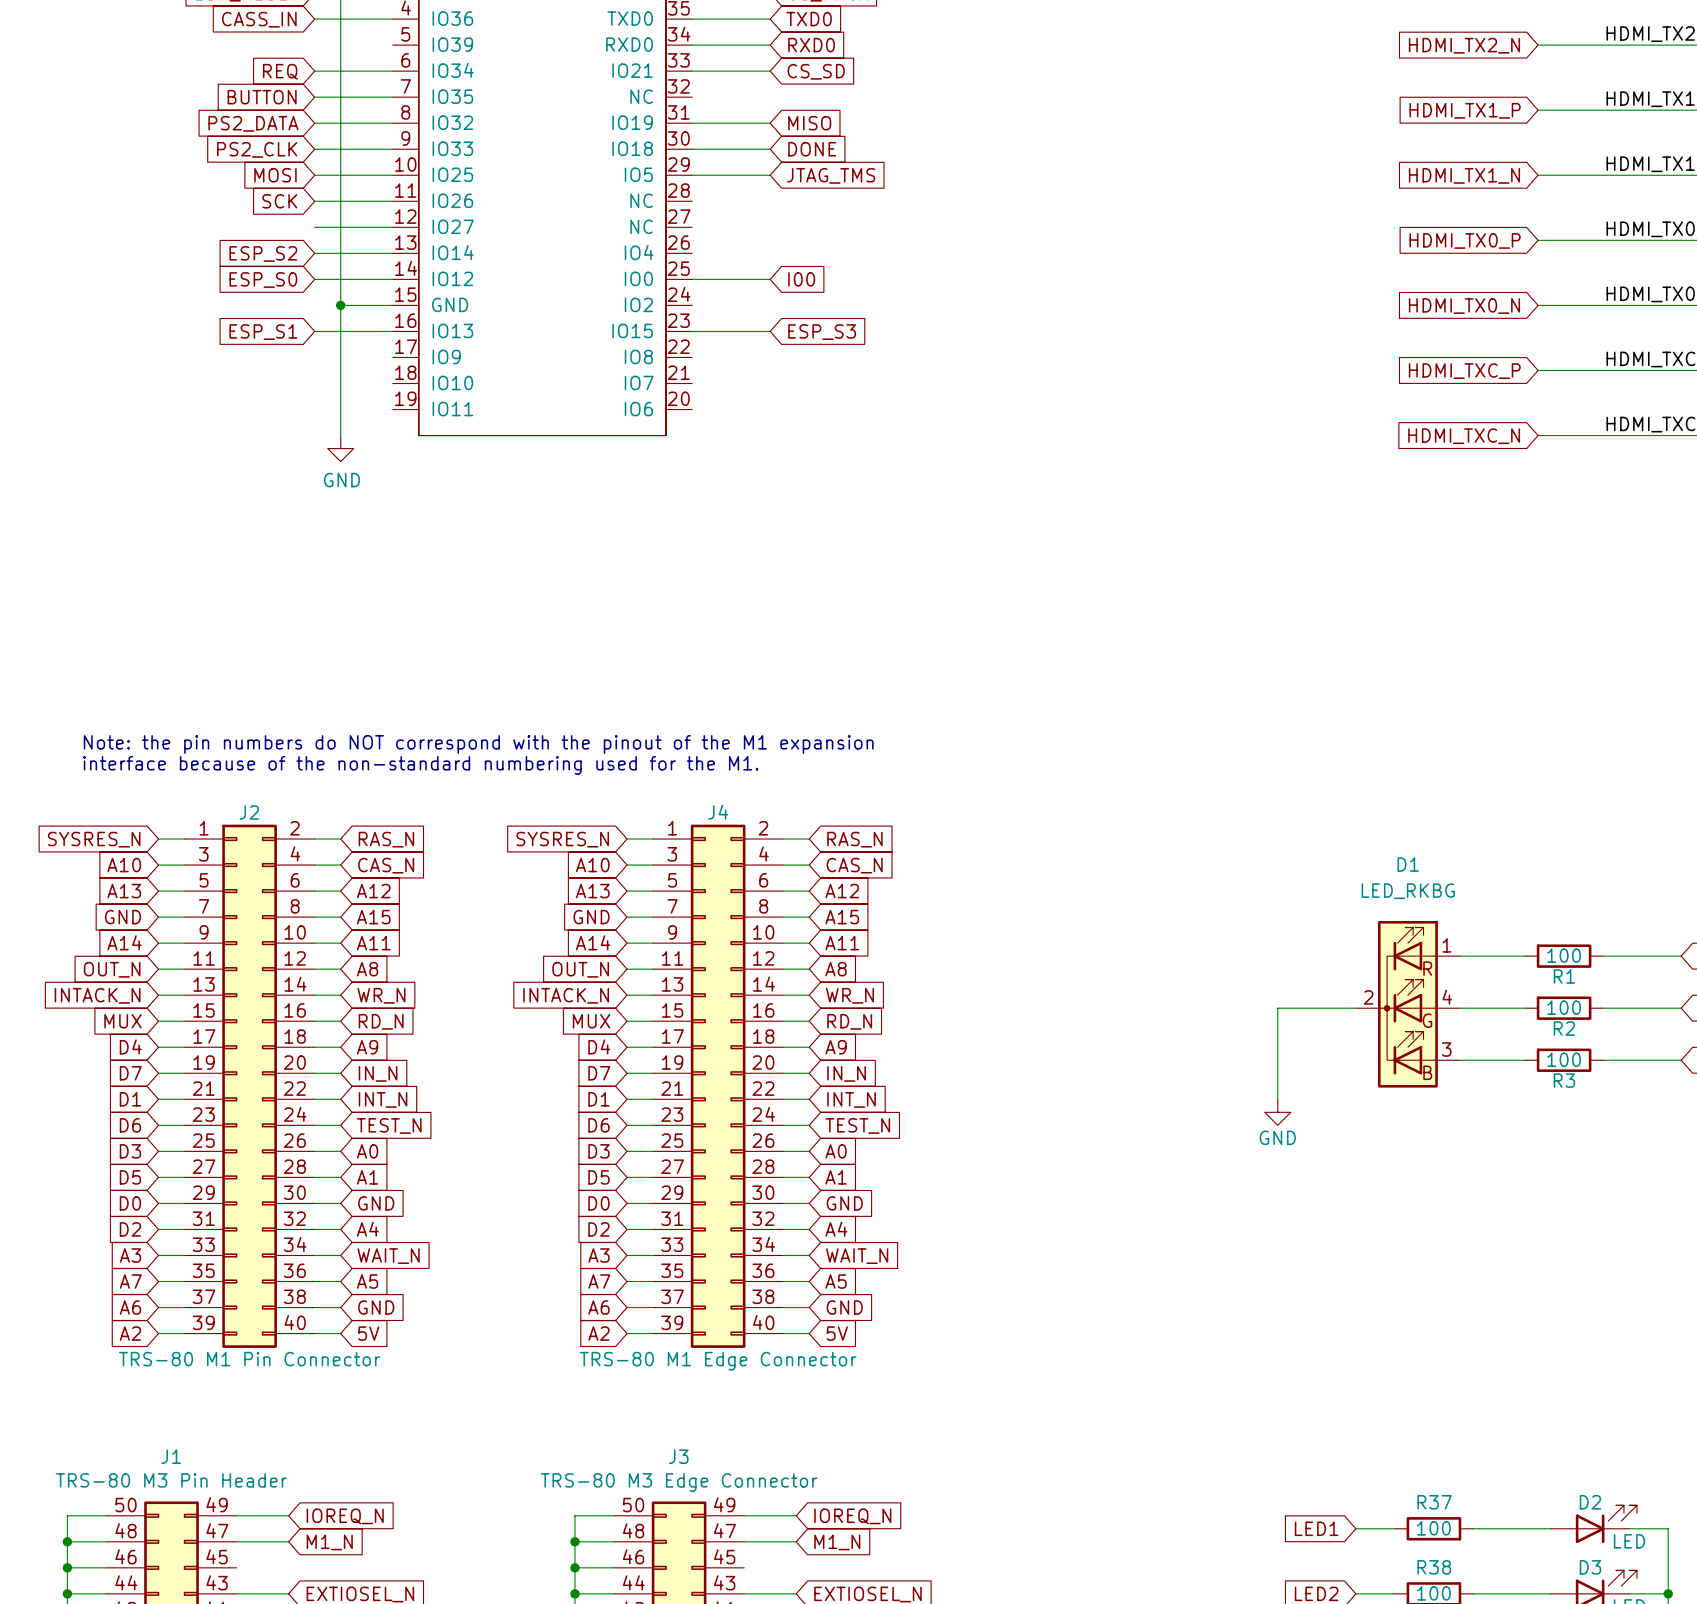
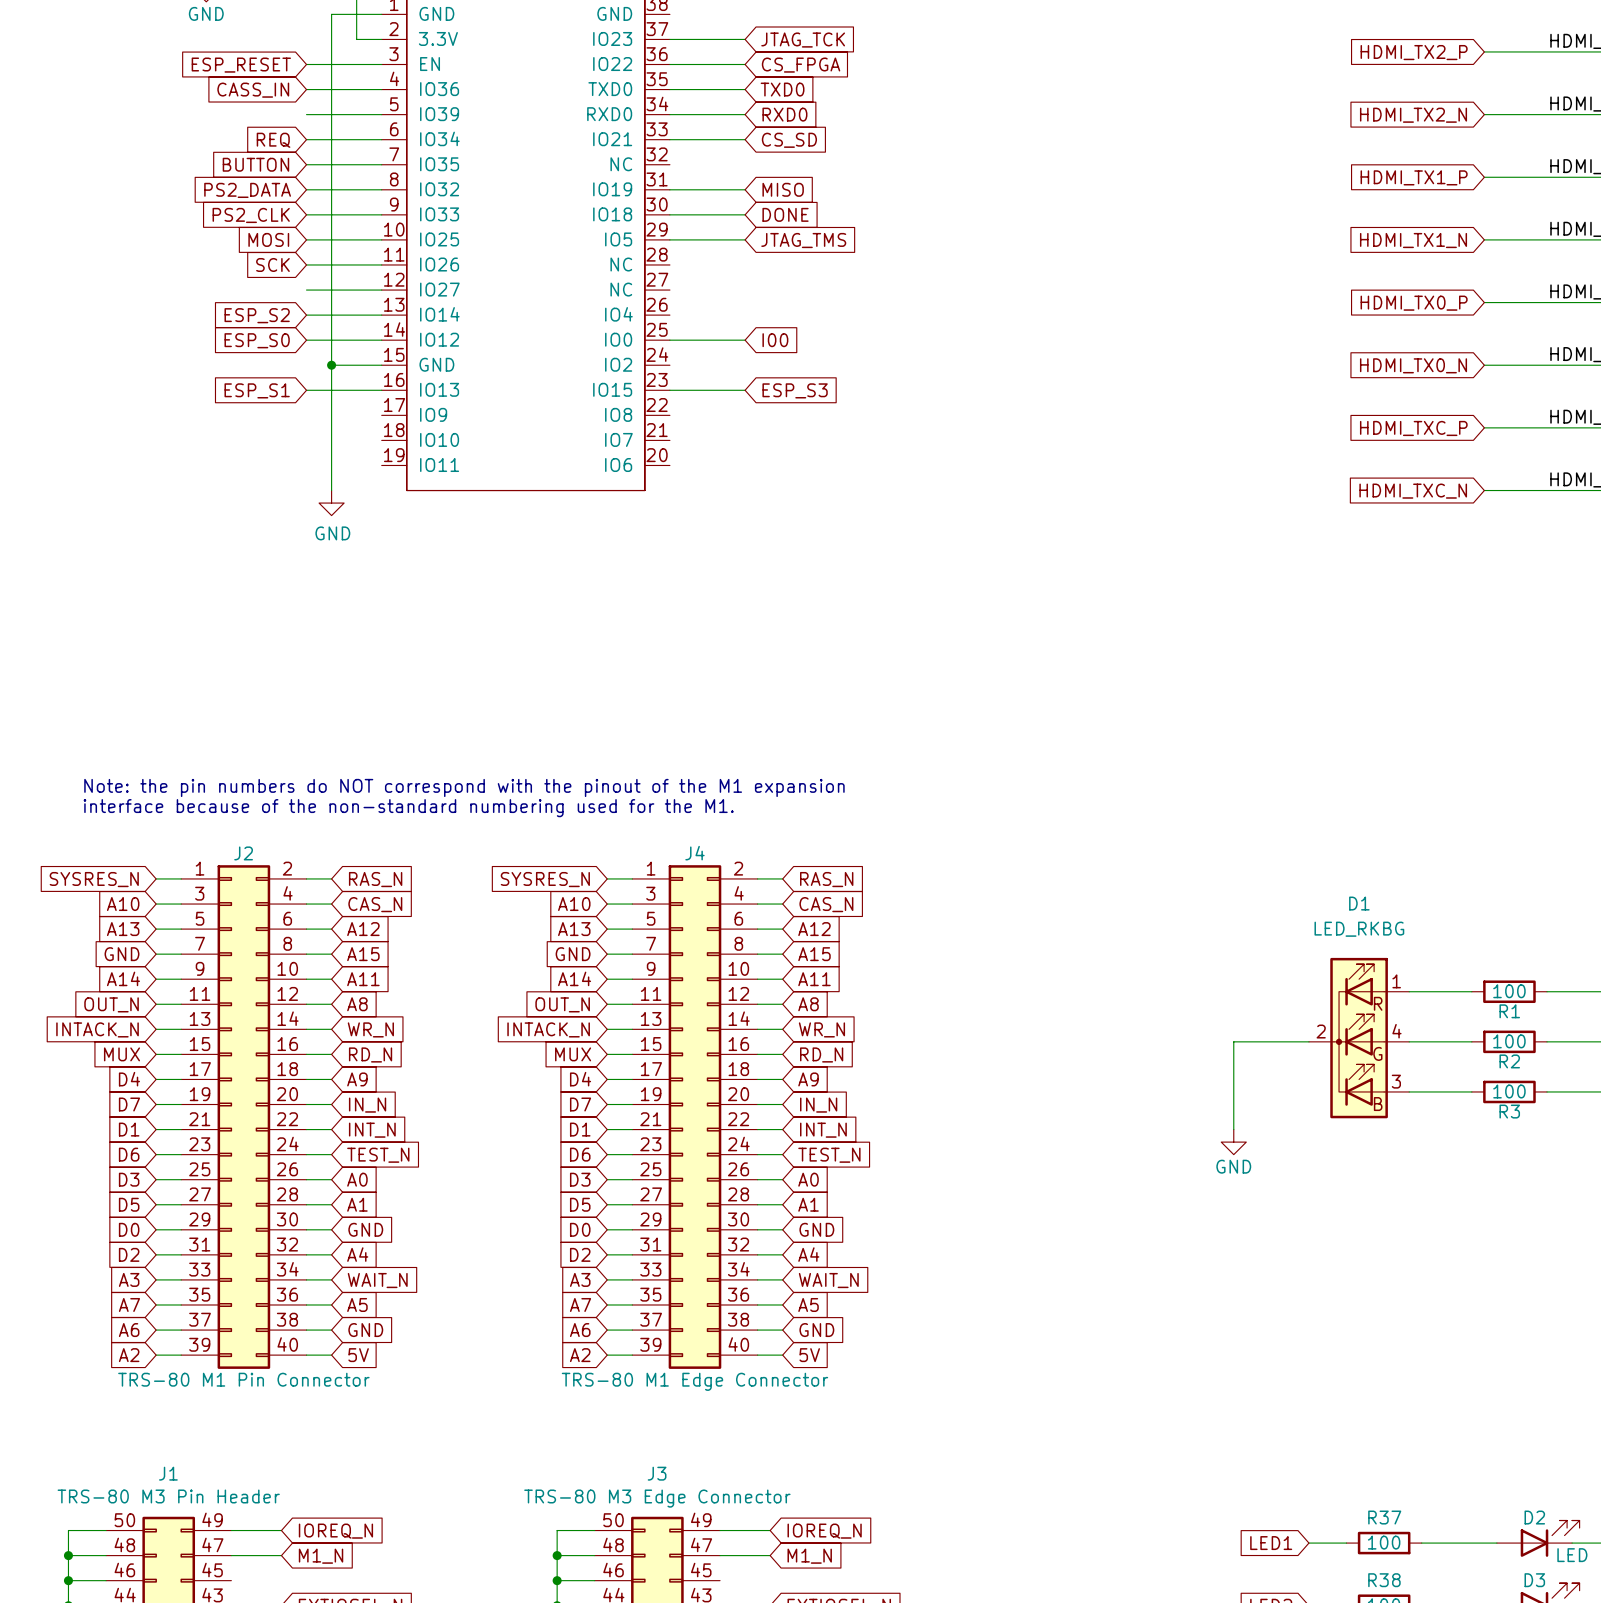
wire: none -> (306, 114) (381, 114)

